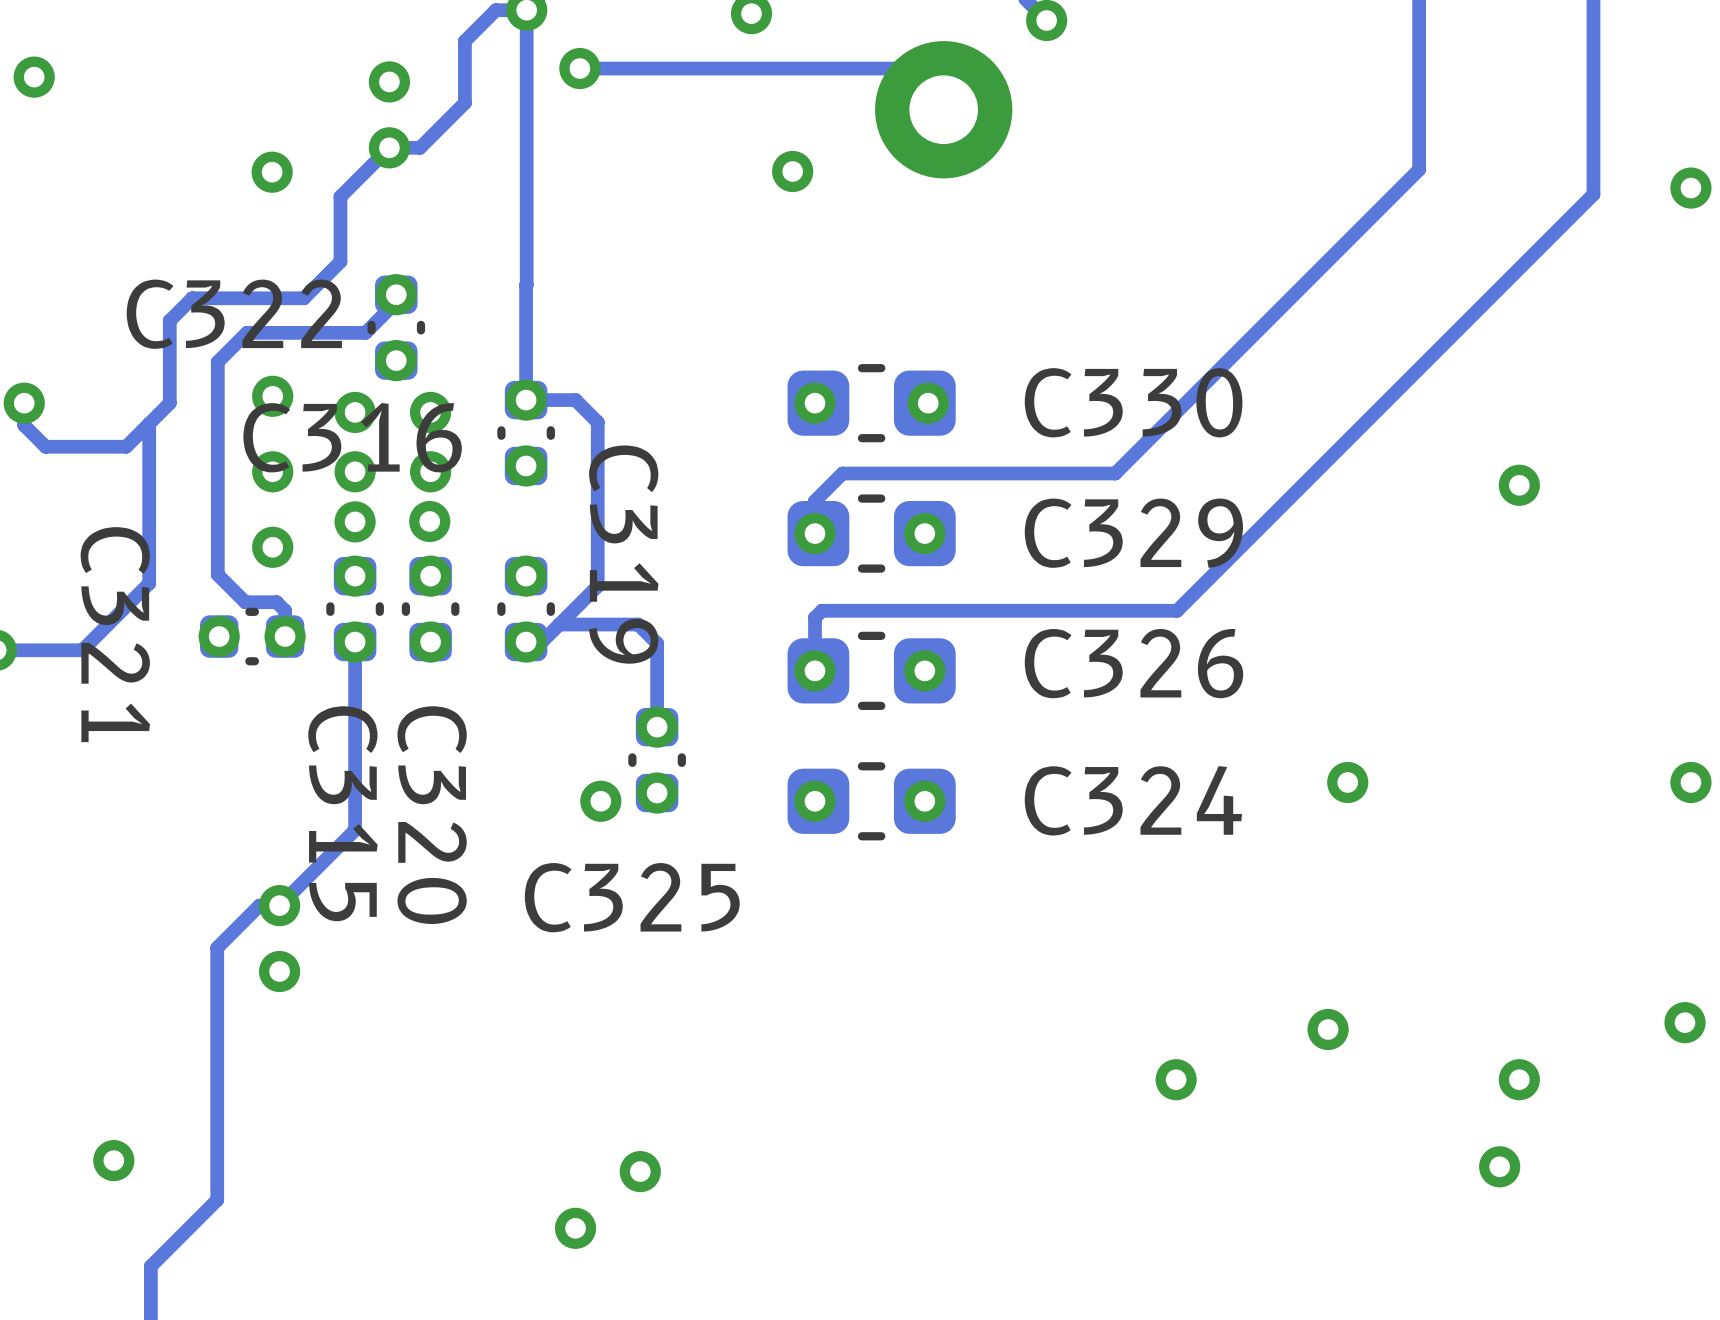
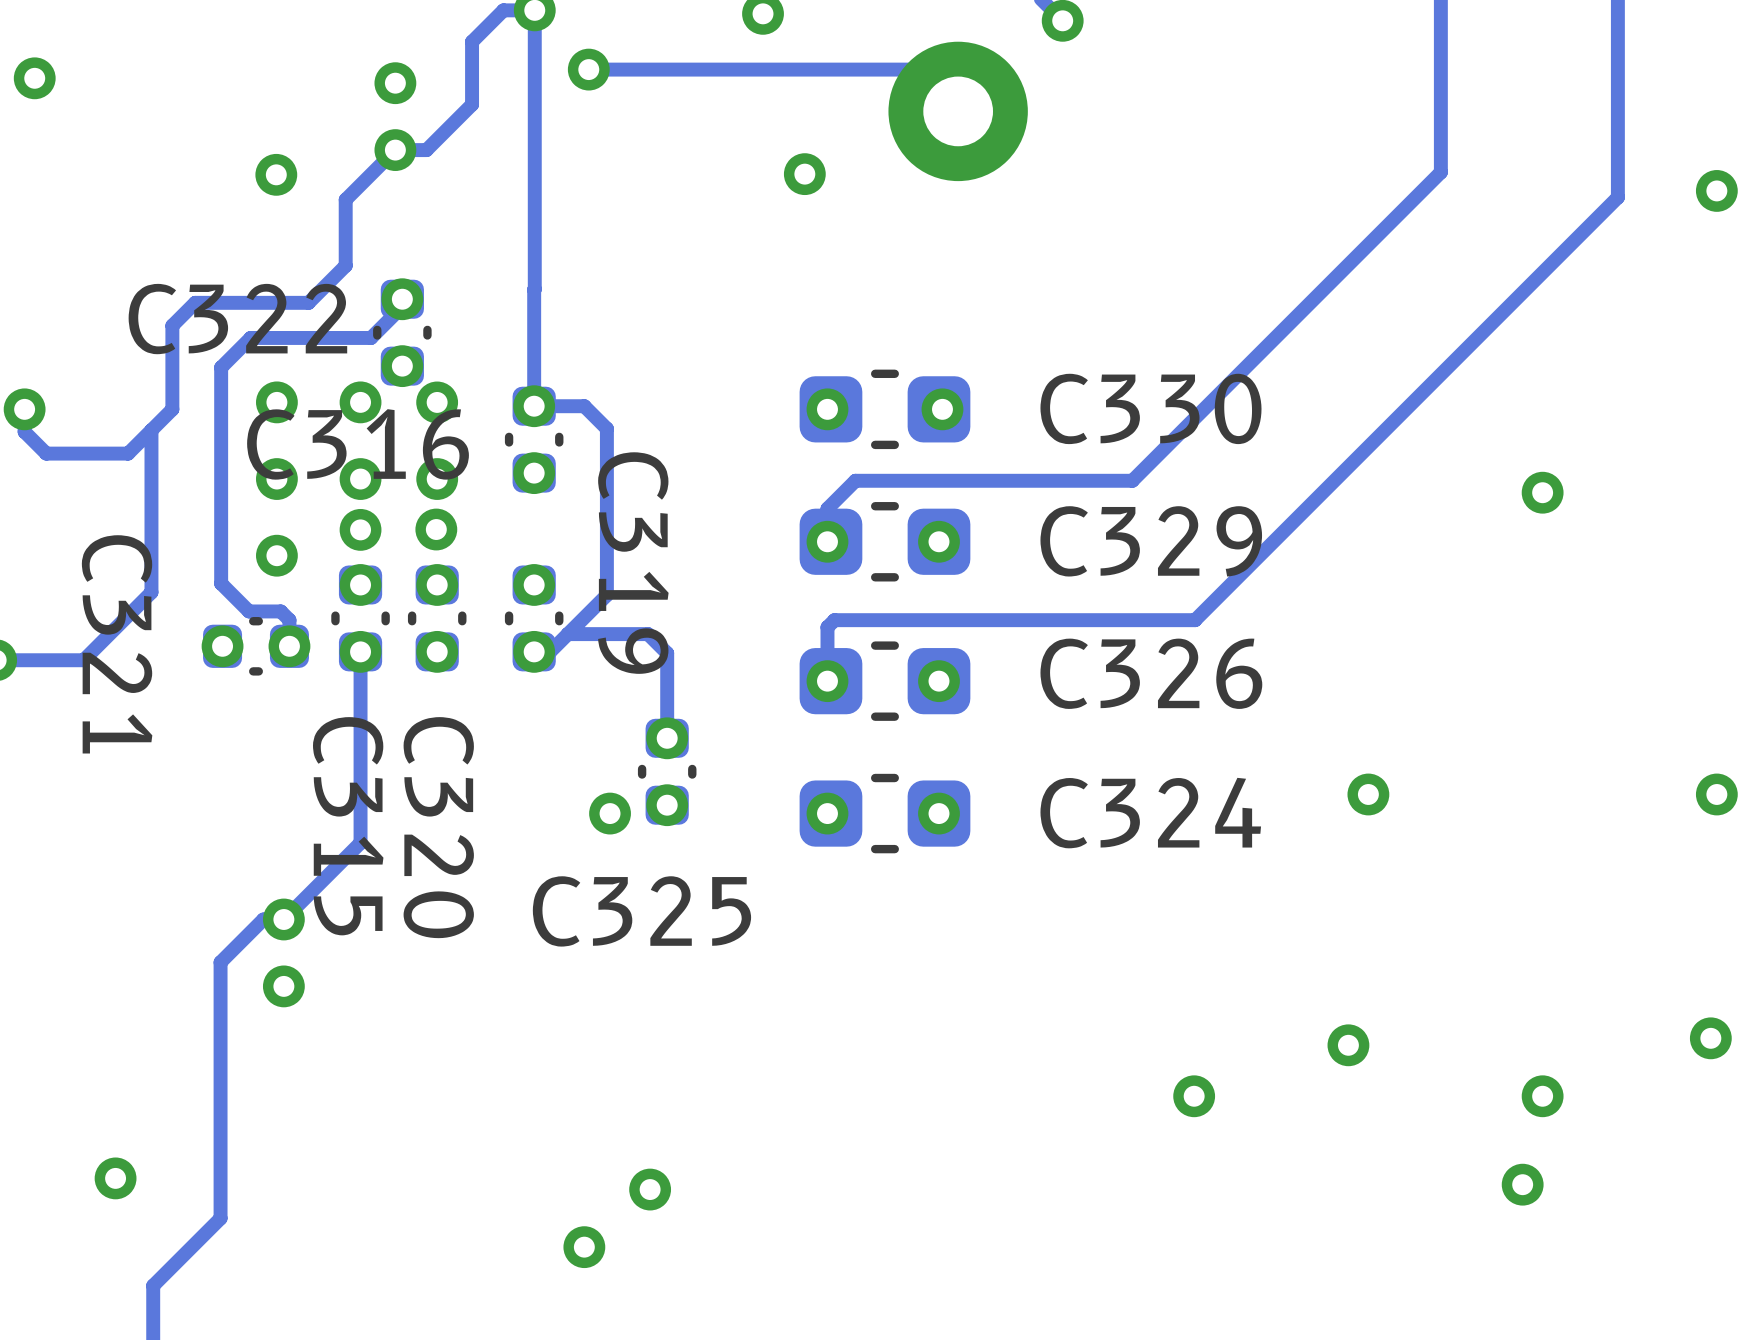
via position: (355, 412) -> (360, 402)
via position: (430, 412) -> (437, 402)

